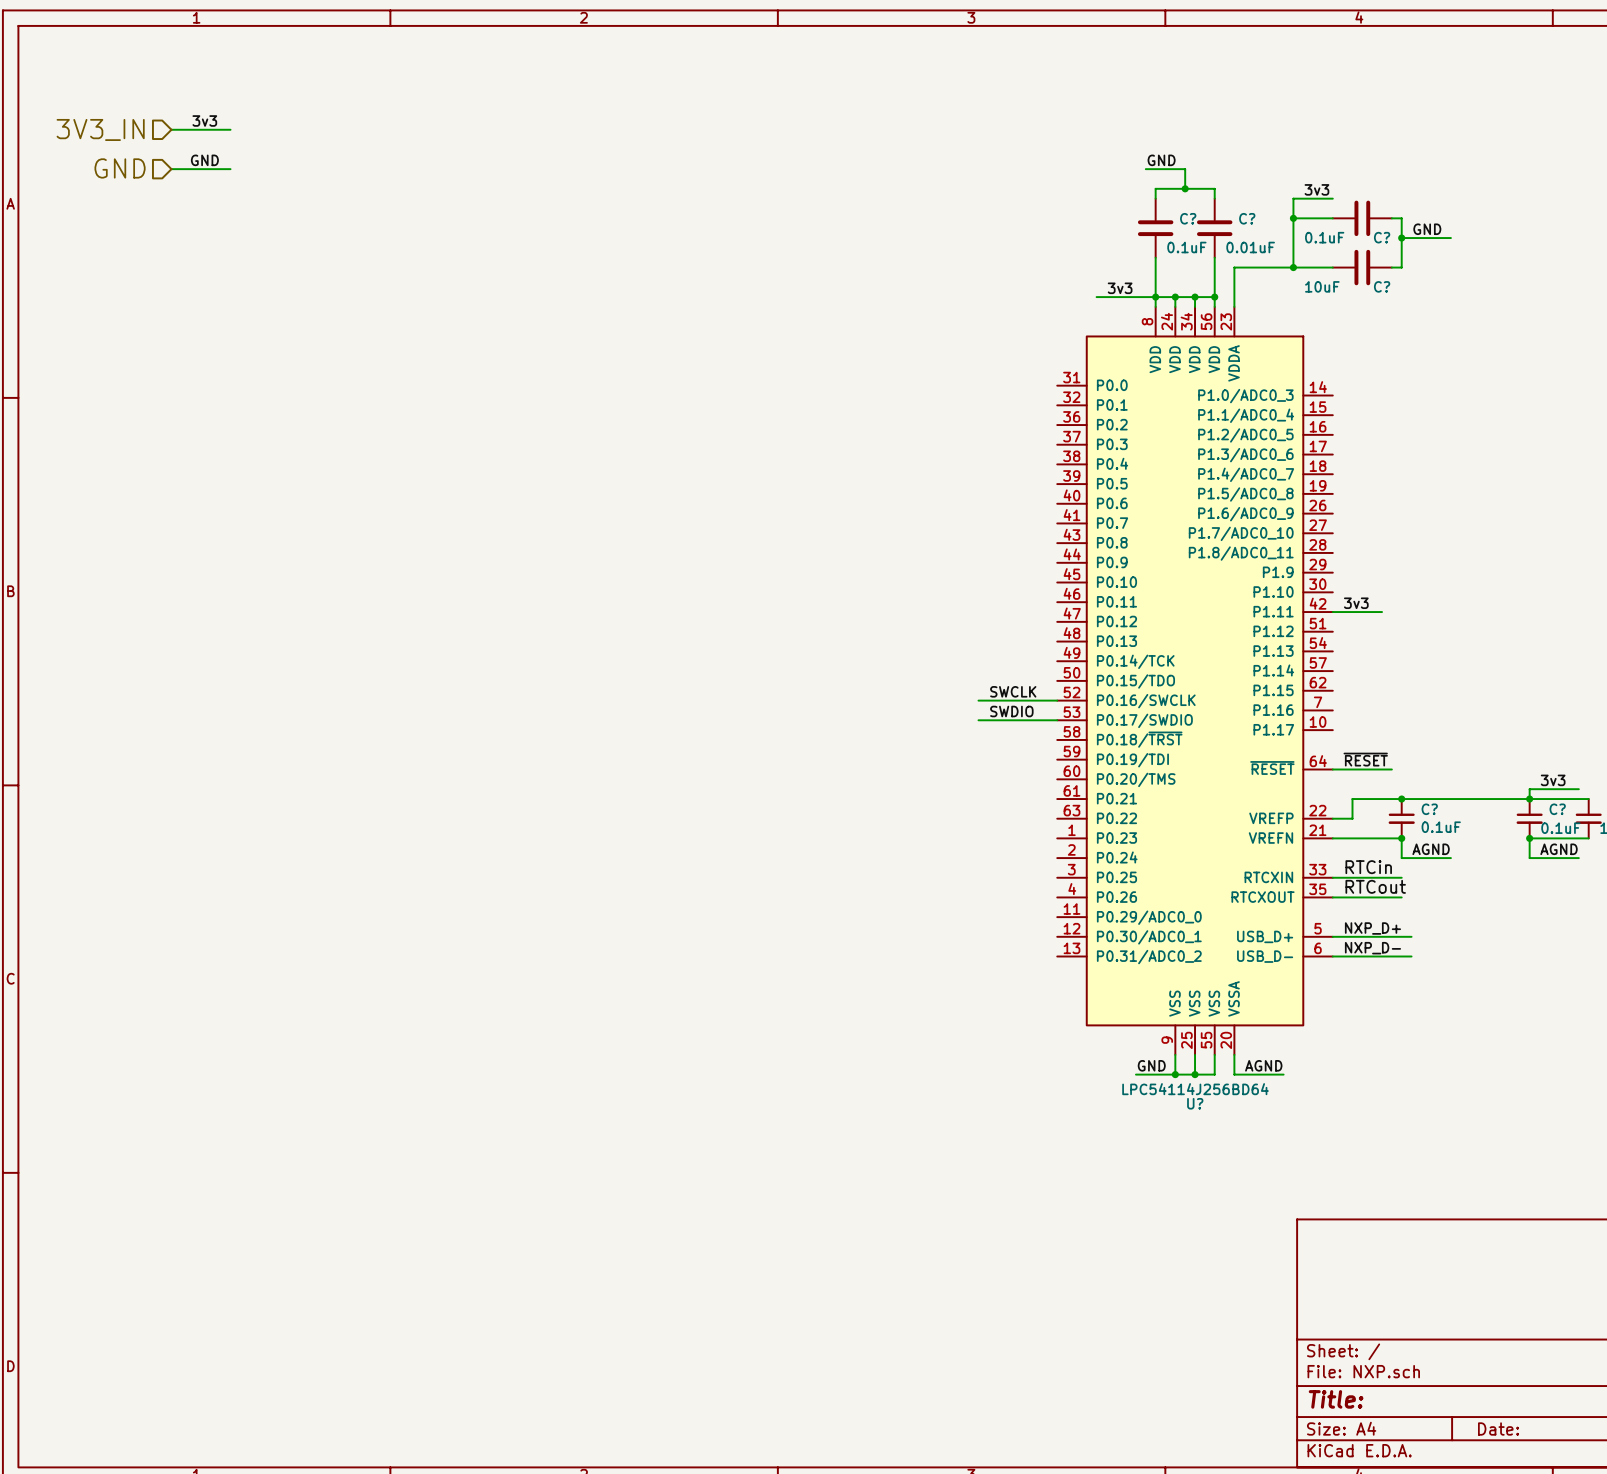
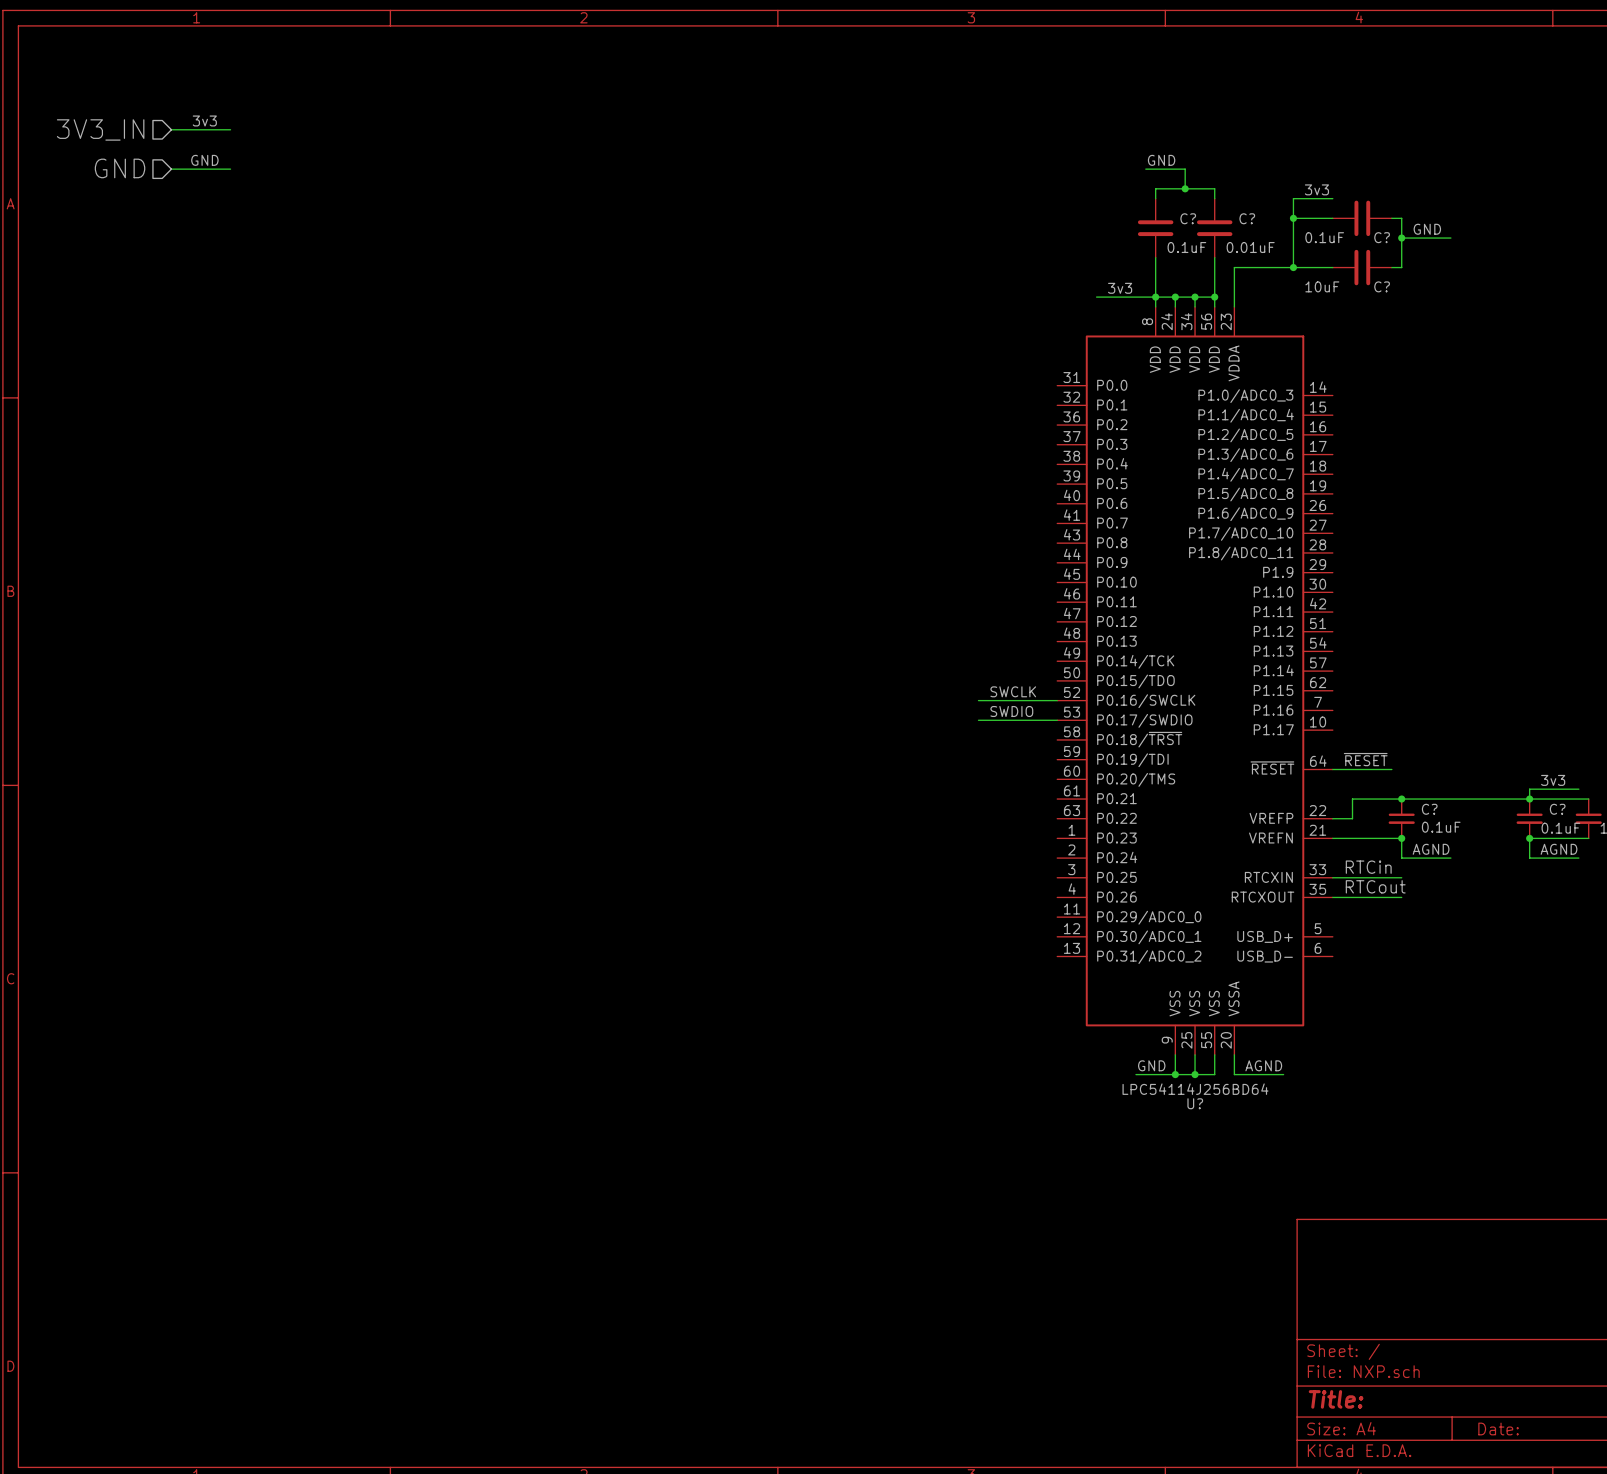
label: 3v3 (1356, 603) -> none
wire: (1332, 612) (1382, 612) -> none
label: NXP_D+ (1372, 928) -> none
wire: (1332, 936) (1411, 936) -> none
label: NXP_D- (1372, 948) -> none
wire: (1332, 956) (1411, 956) -> none

